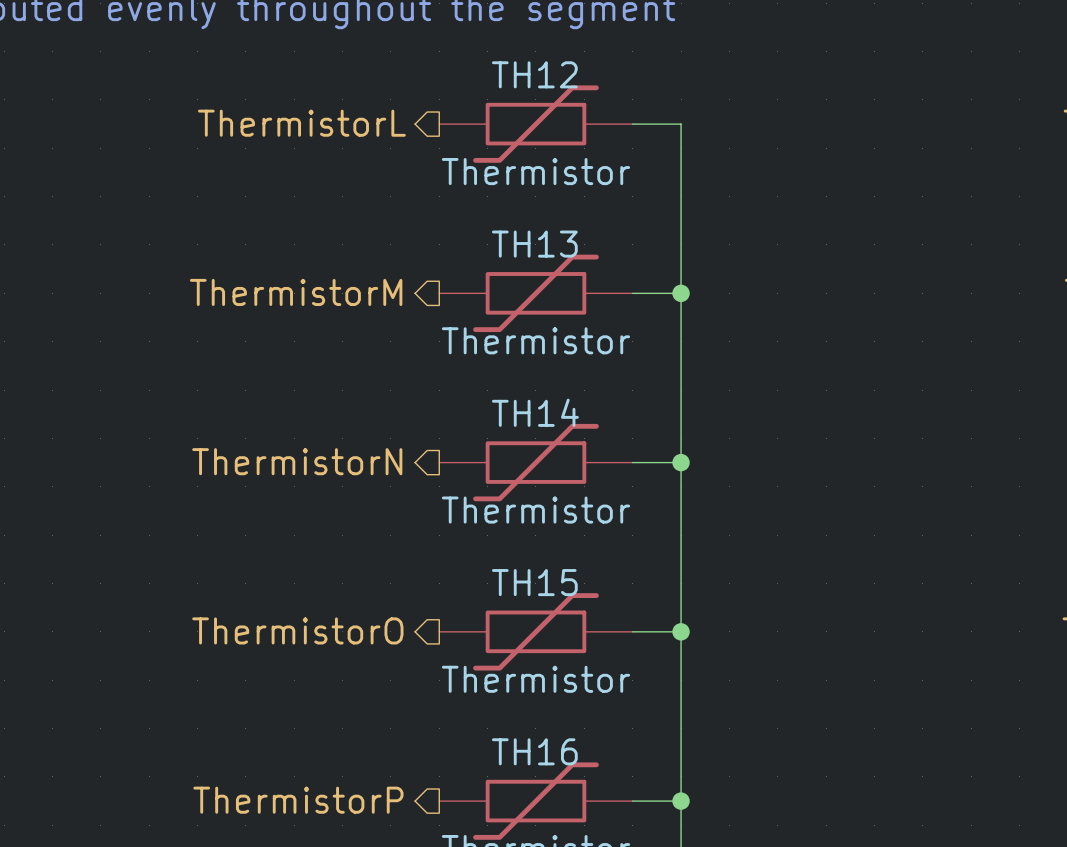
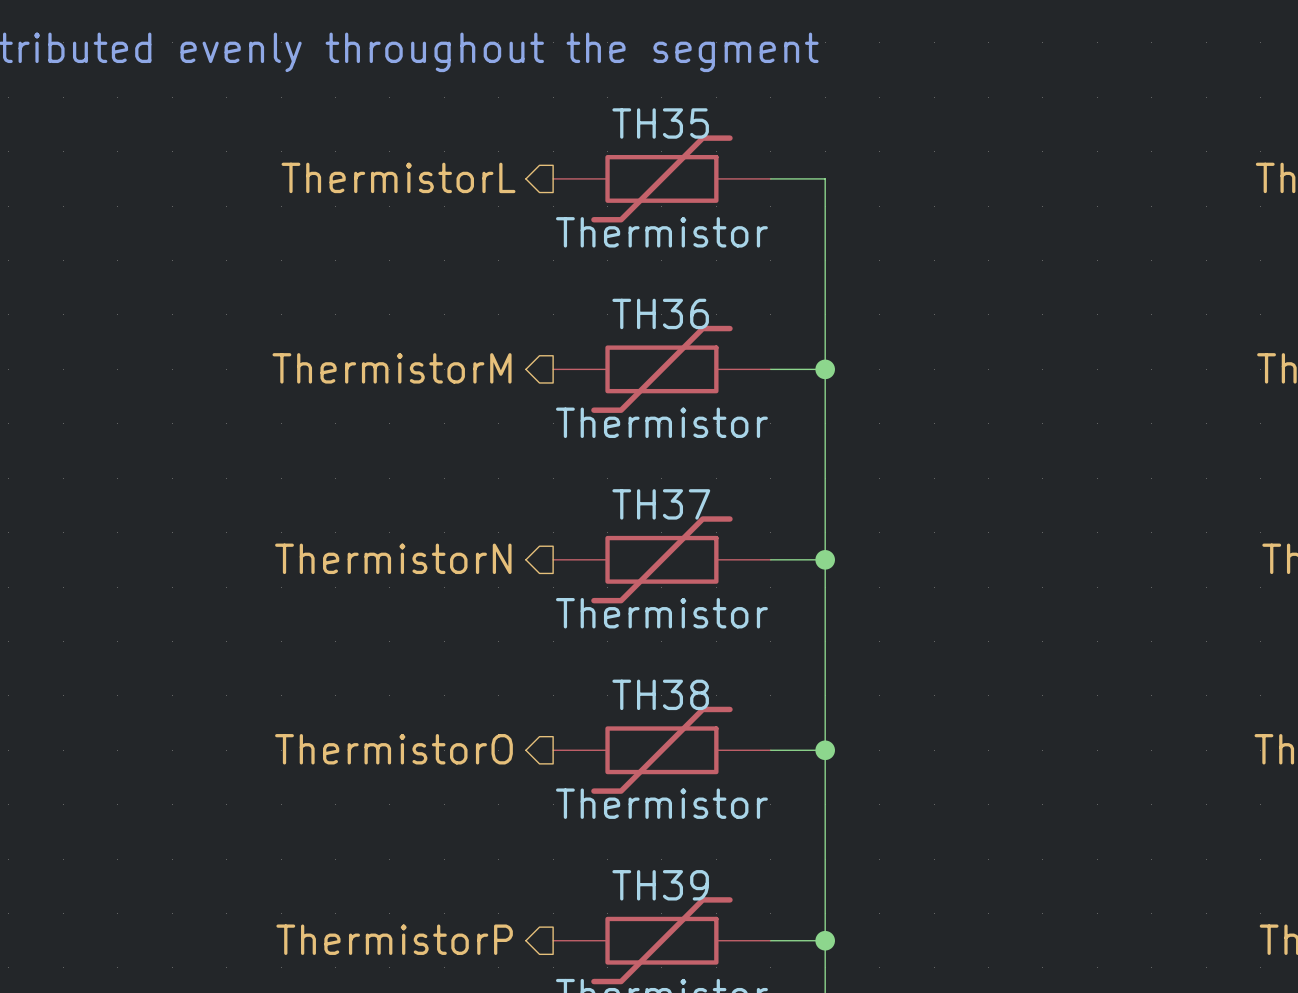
TH12 name: TH12 (534, 74) -> TH35 (660, 123)
TH13 name: TH13 (534, 244) -> TH36 (660, 313)
TH14 name: TH14 (535, 412) -> TH37 (661, 504)
TH15 name: TH15 (534, 582) -> TH38 (660, 694)
TH16 name: TH16 (534, 751) -> TH39 (660, 885)

